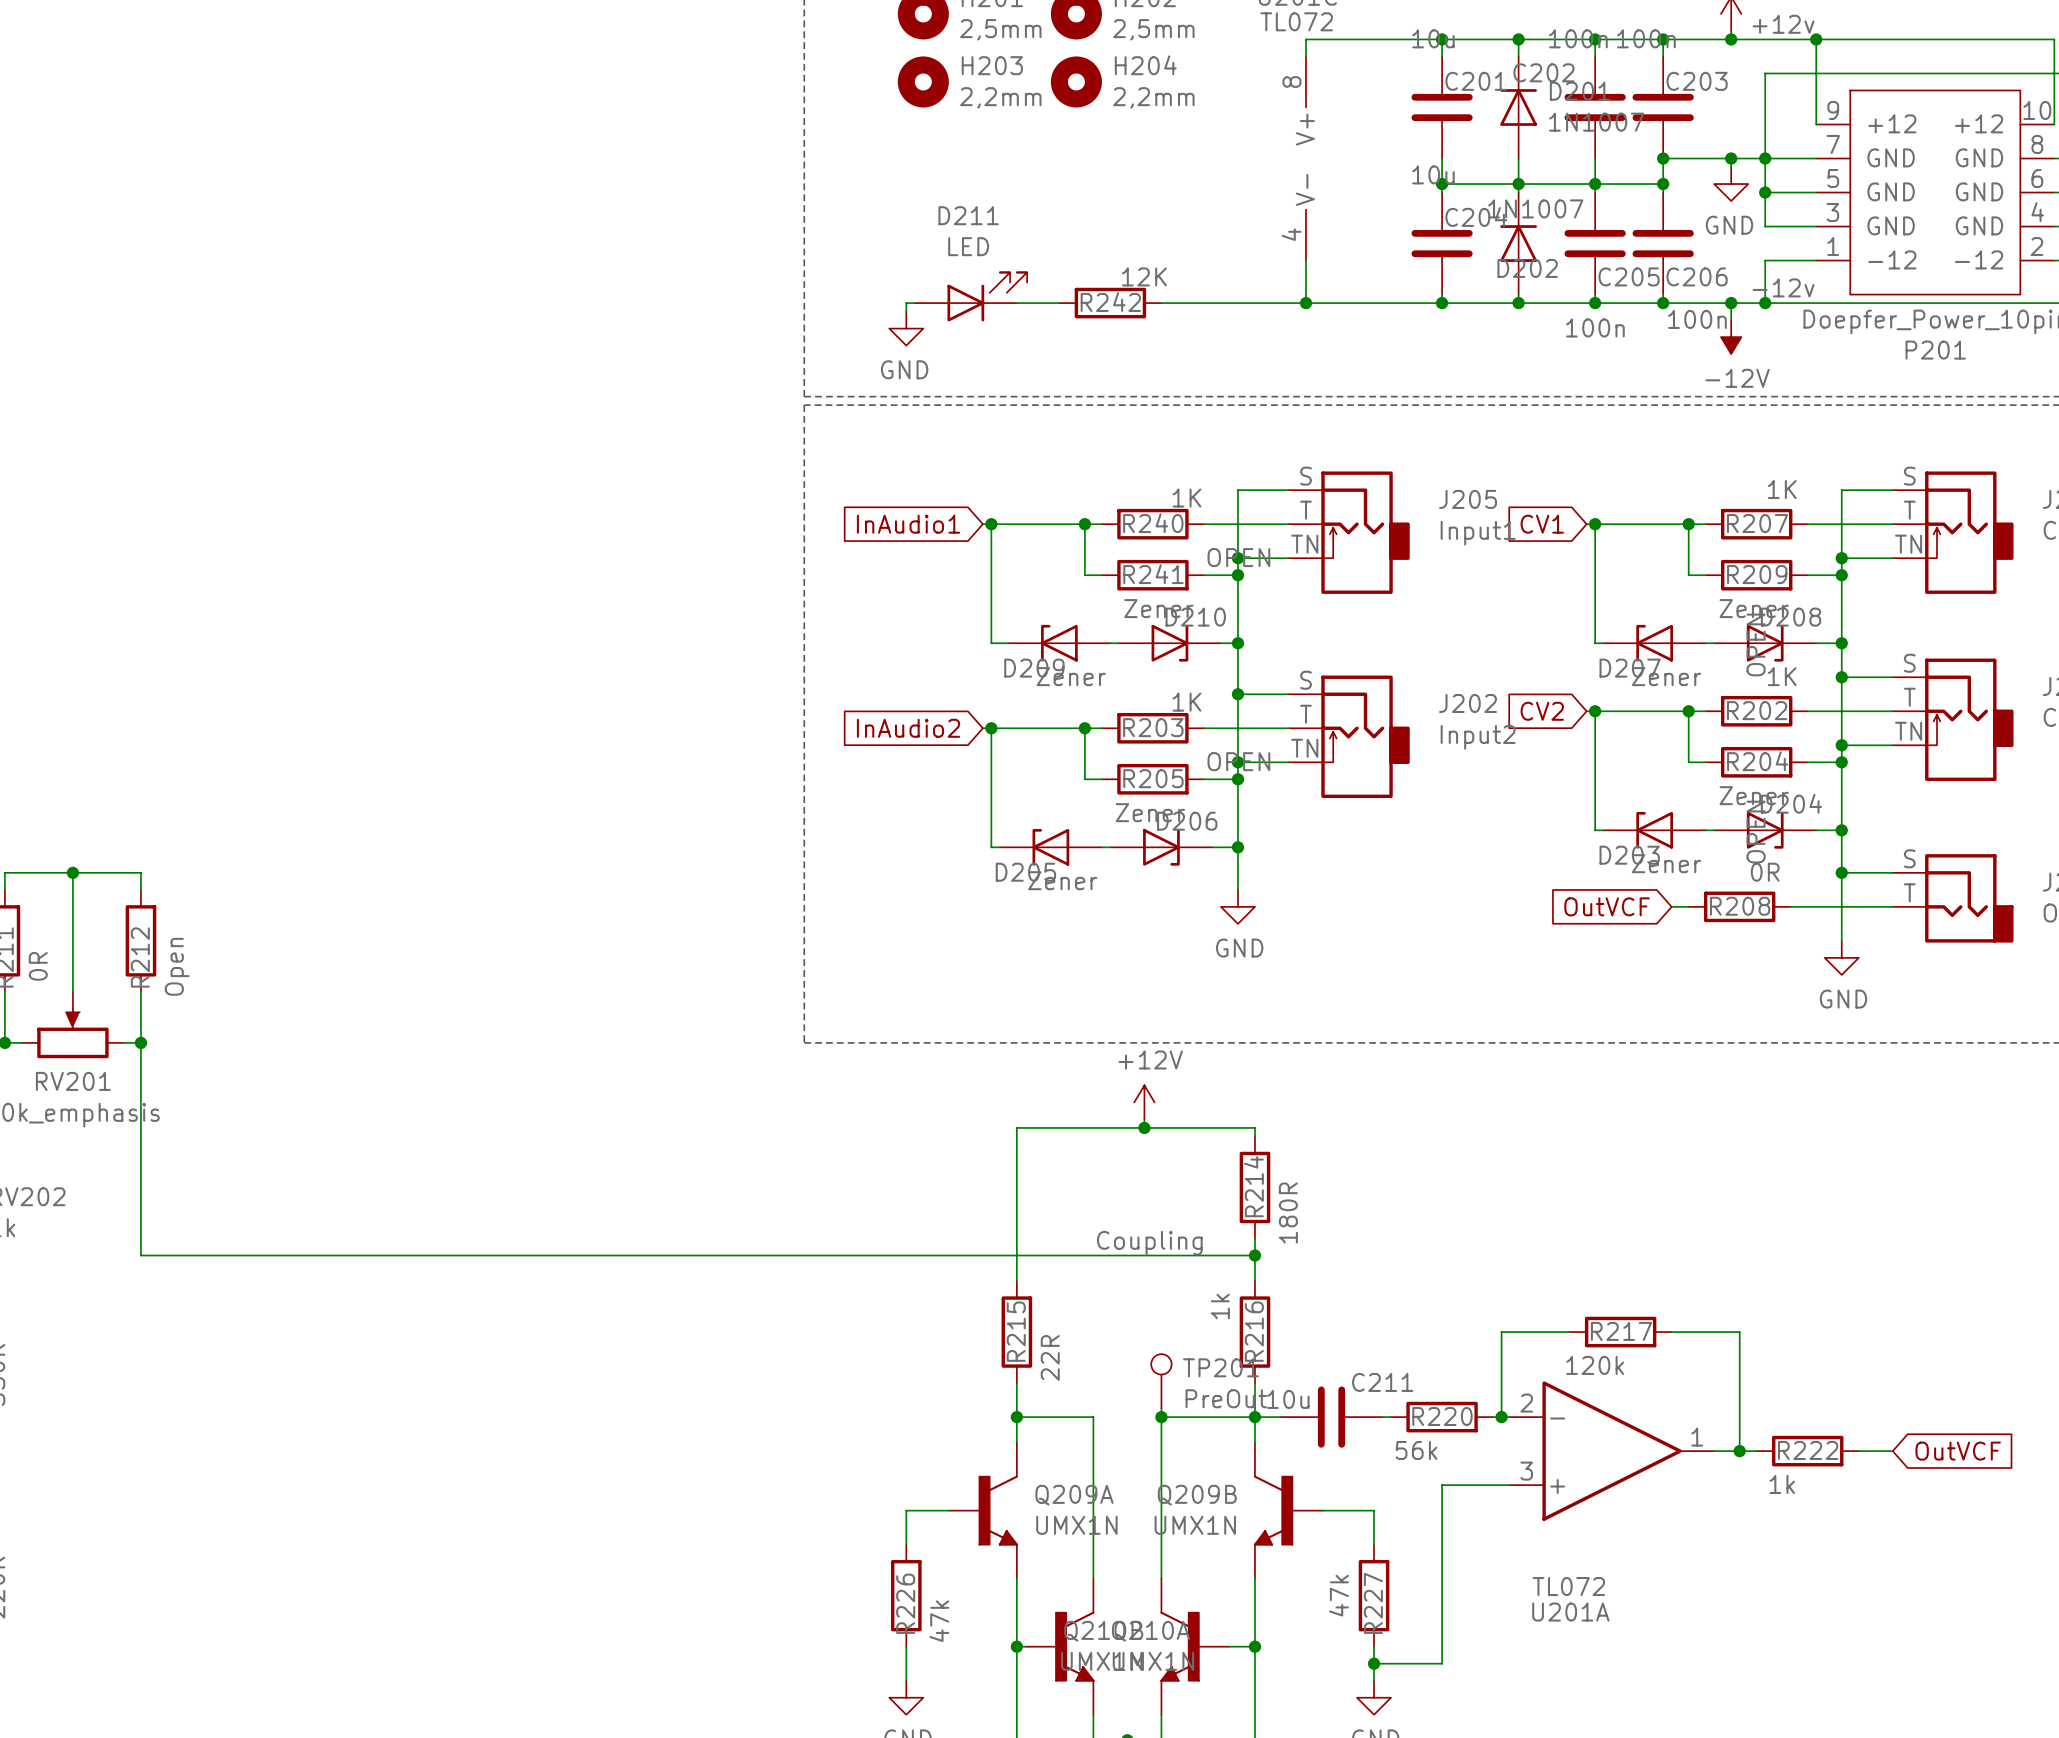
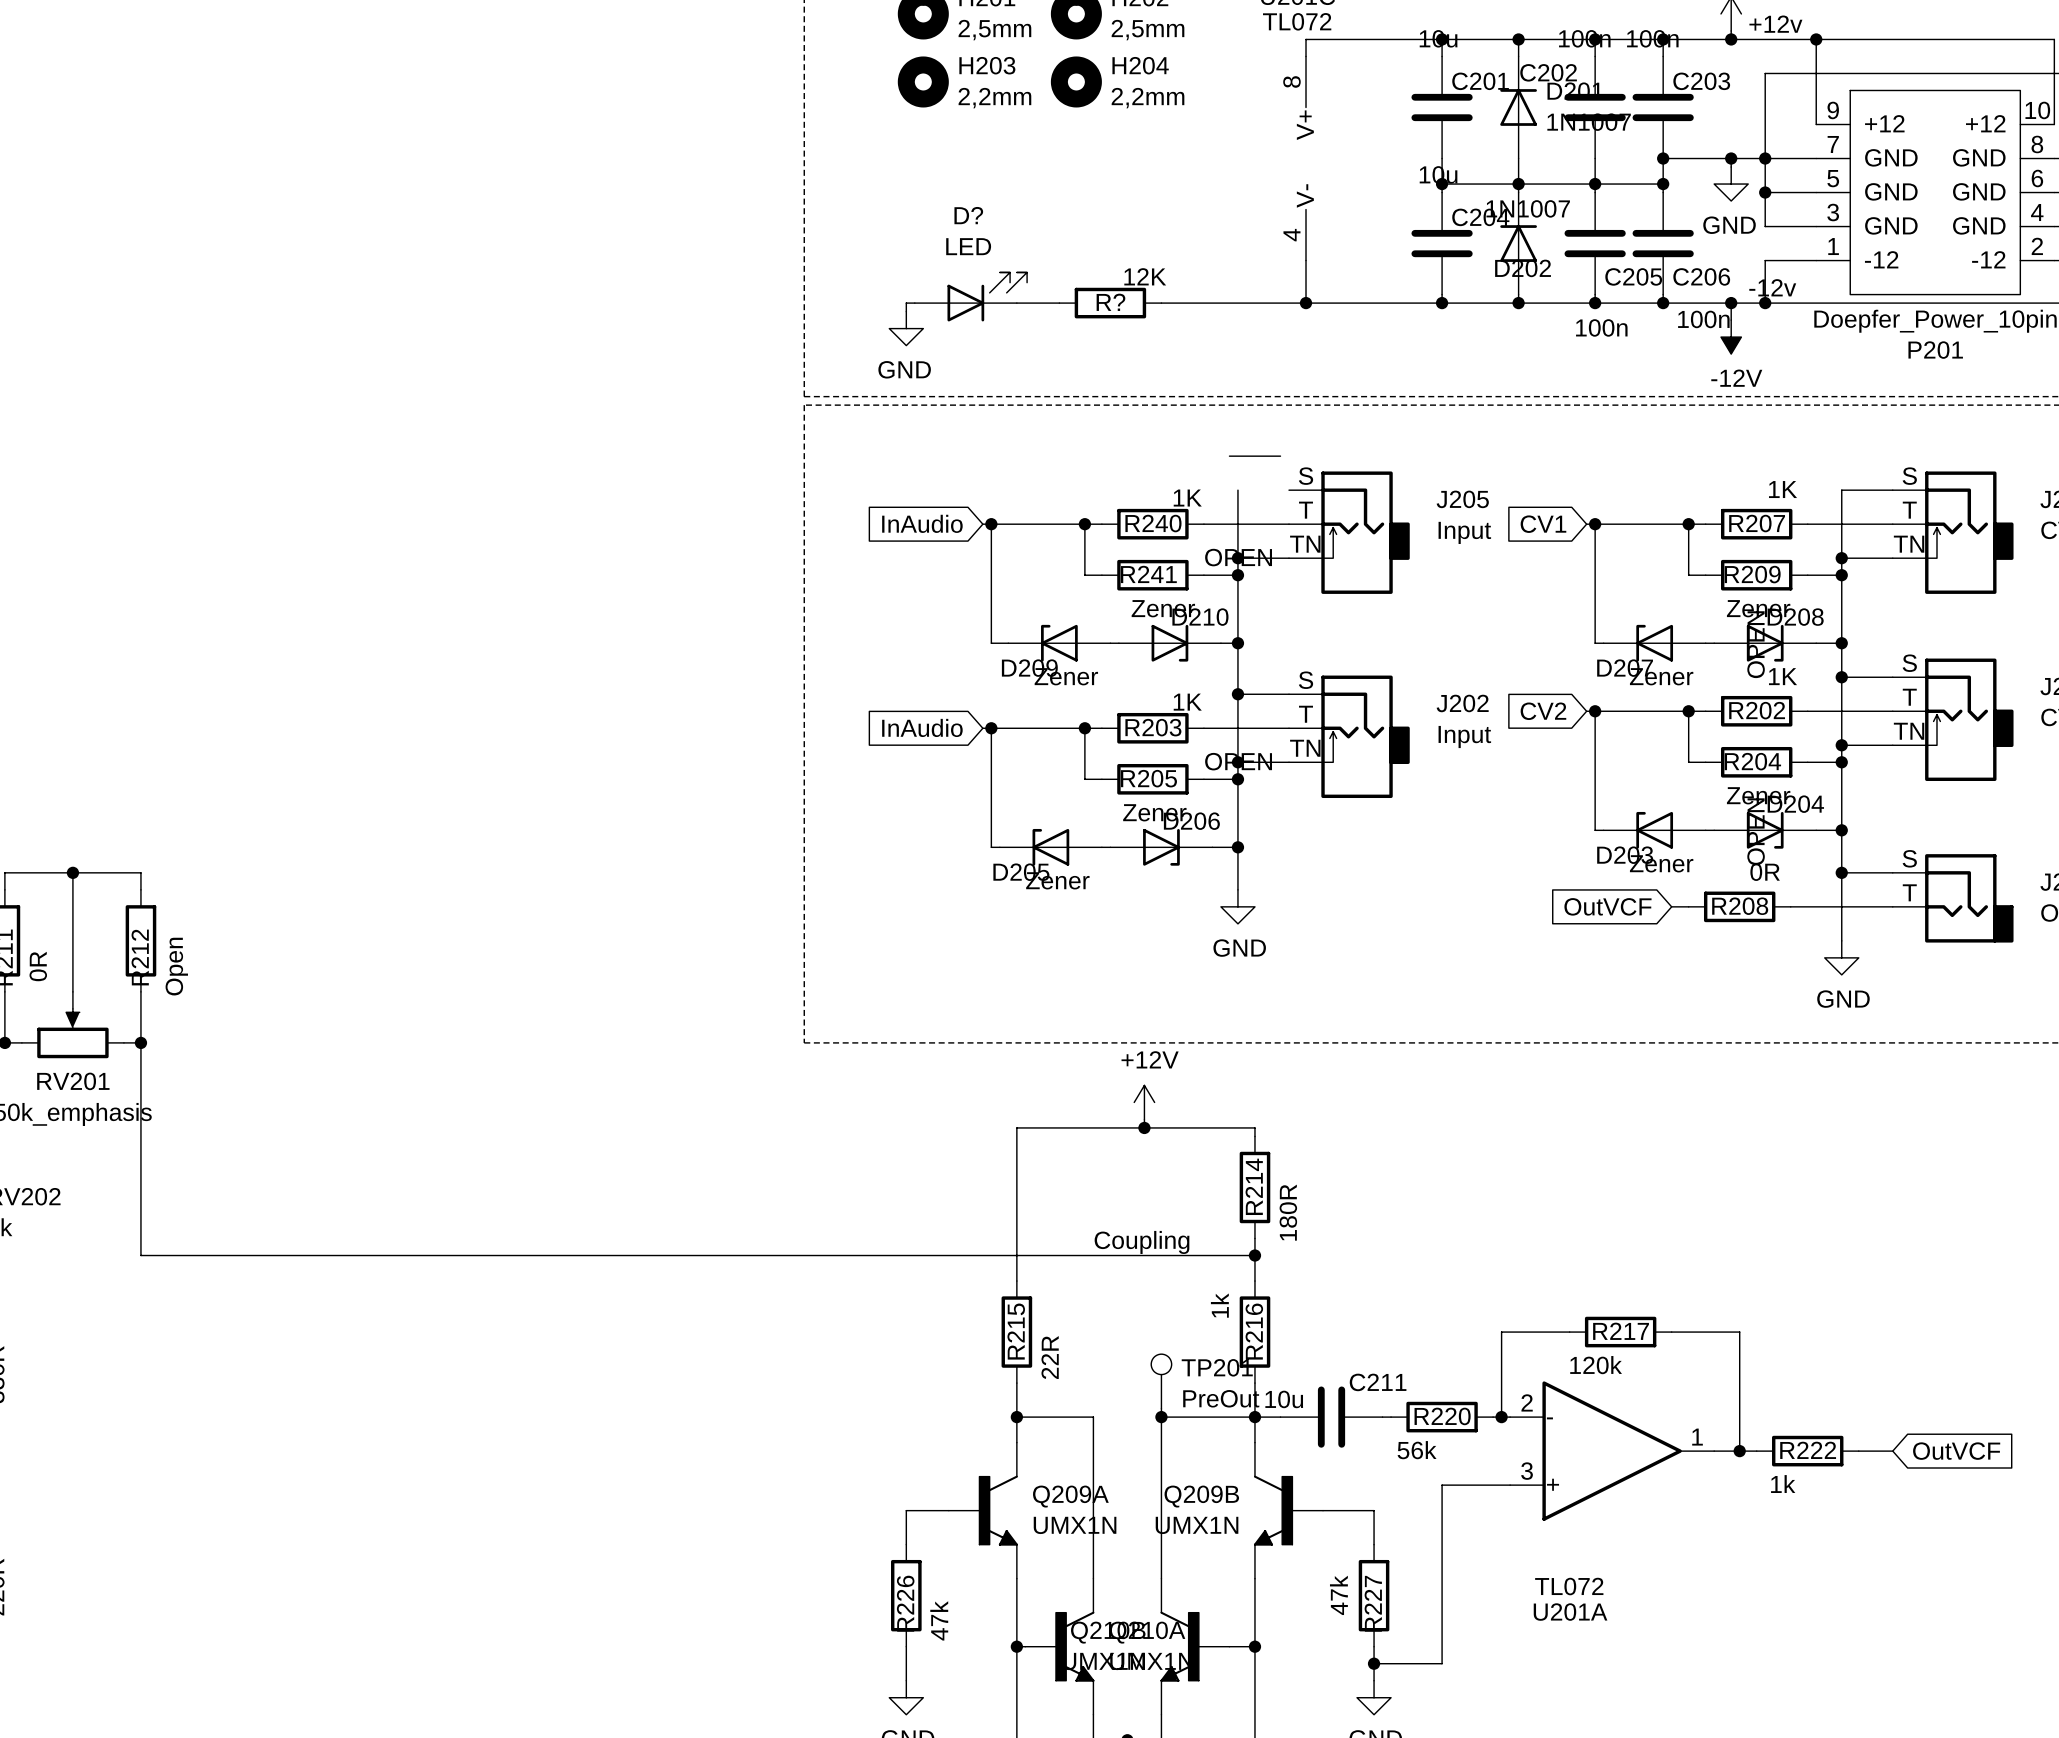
D211 name: D211 (968, 215) -> D? (968, 215)
R242 name: R242 (1110, 302) -> R? (1110, 302)
wire: (1237, 490) (1288, 490) -> (1229, 456) (1280, 456)
global label: InAudio1 (908, 524) -> InAudio (922, 523)
J205 value: Input1 (1478, 533) -> Input (1464, 532)
global label: InAudio2 (908, 728) -> InAudio (922, 727)
J202 value: Input2 (1478, 737) -> Input (1464, 737)

